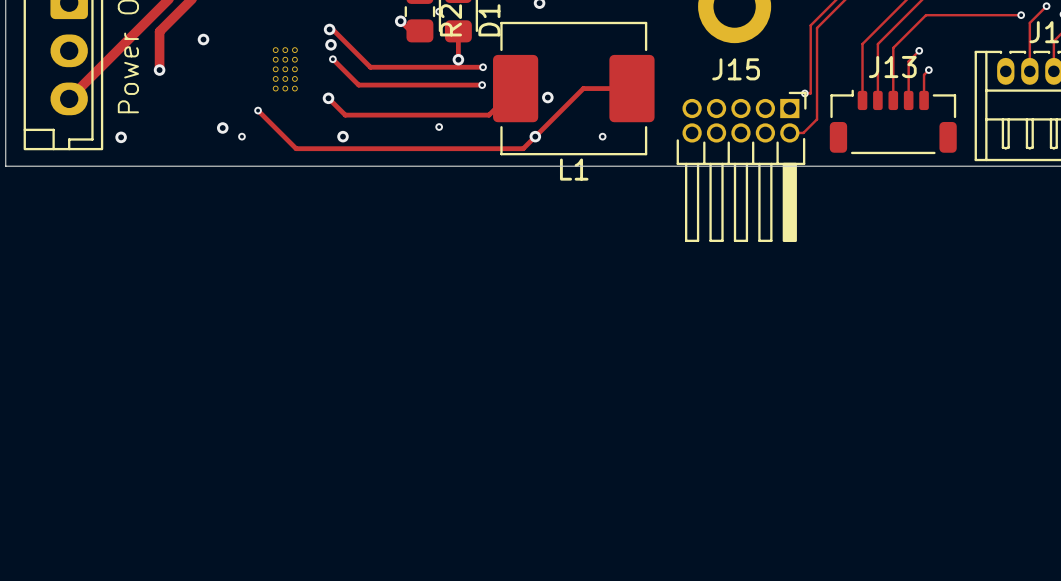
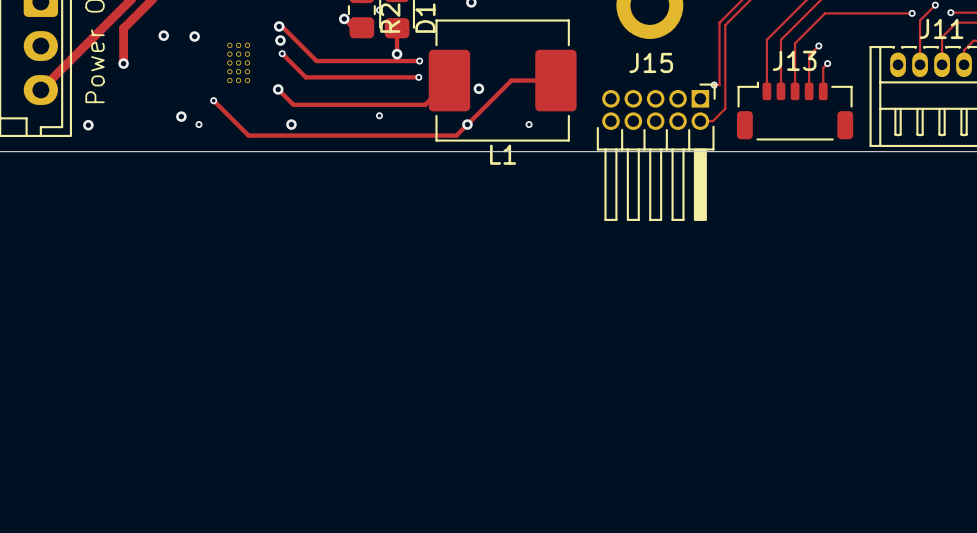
via: none -> (194, 36)

